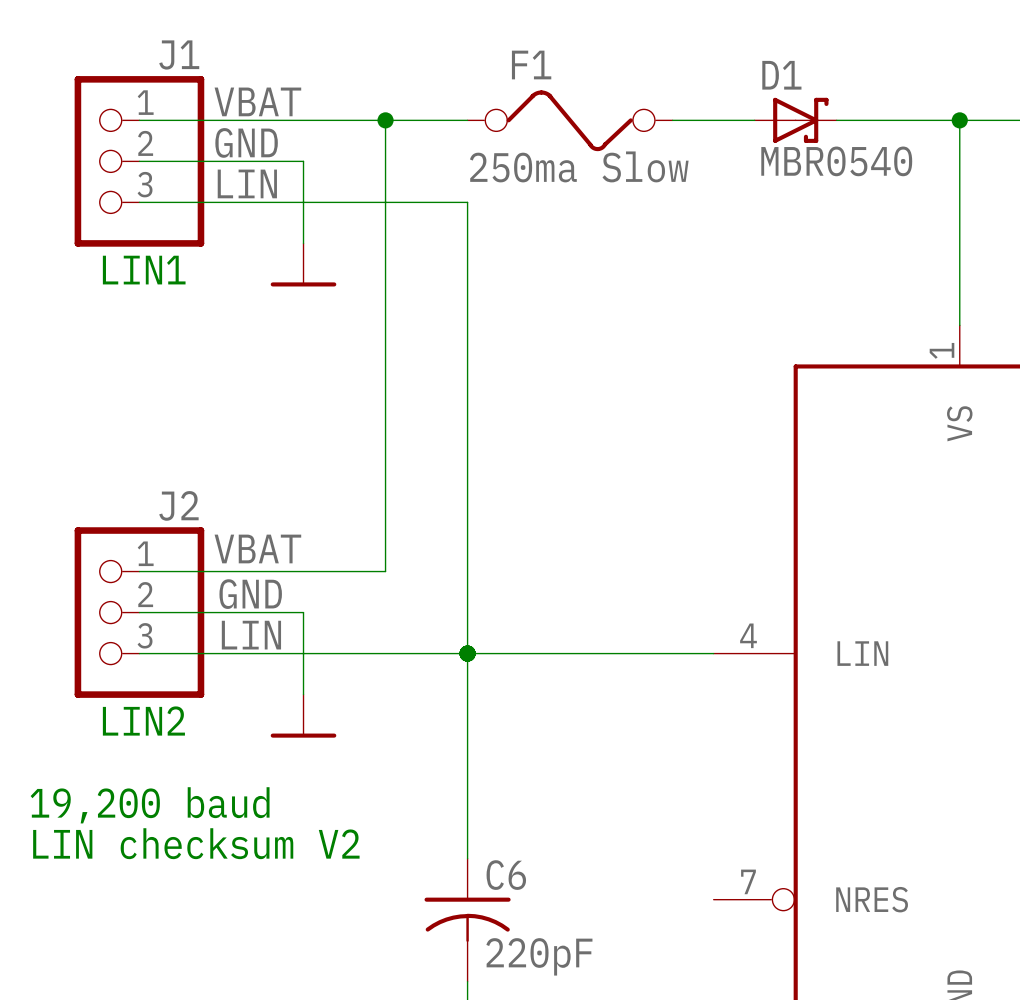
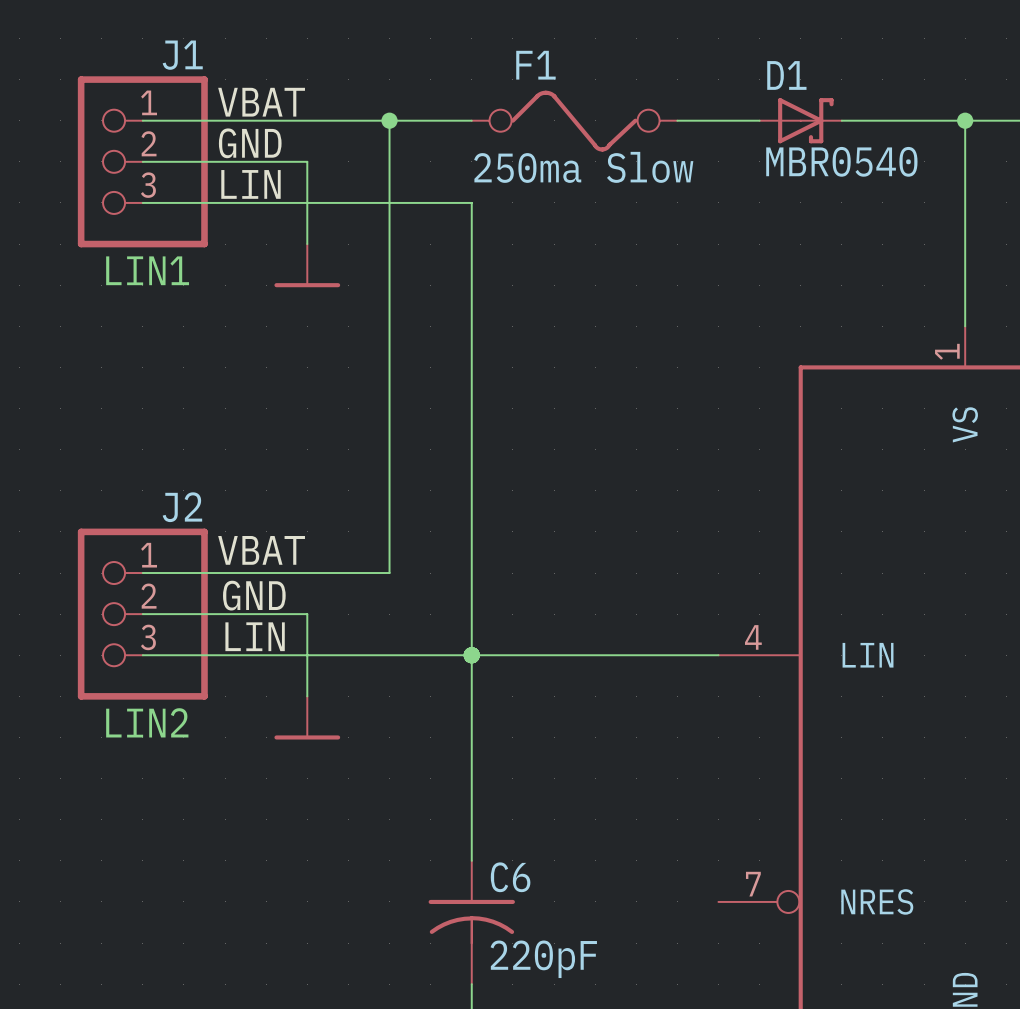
text: 19,200 baud (150, 805) -> none
text: LIN checksum V2 (196, 843) -> none

